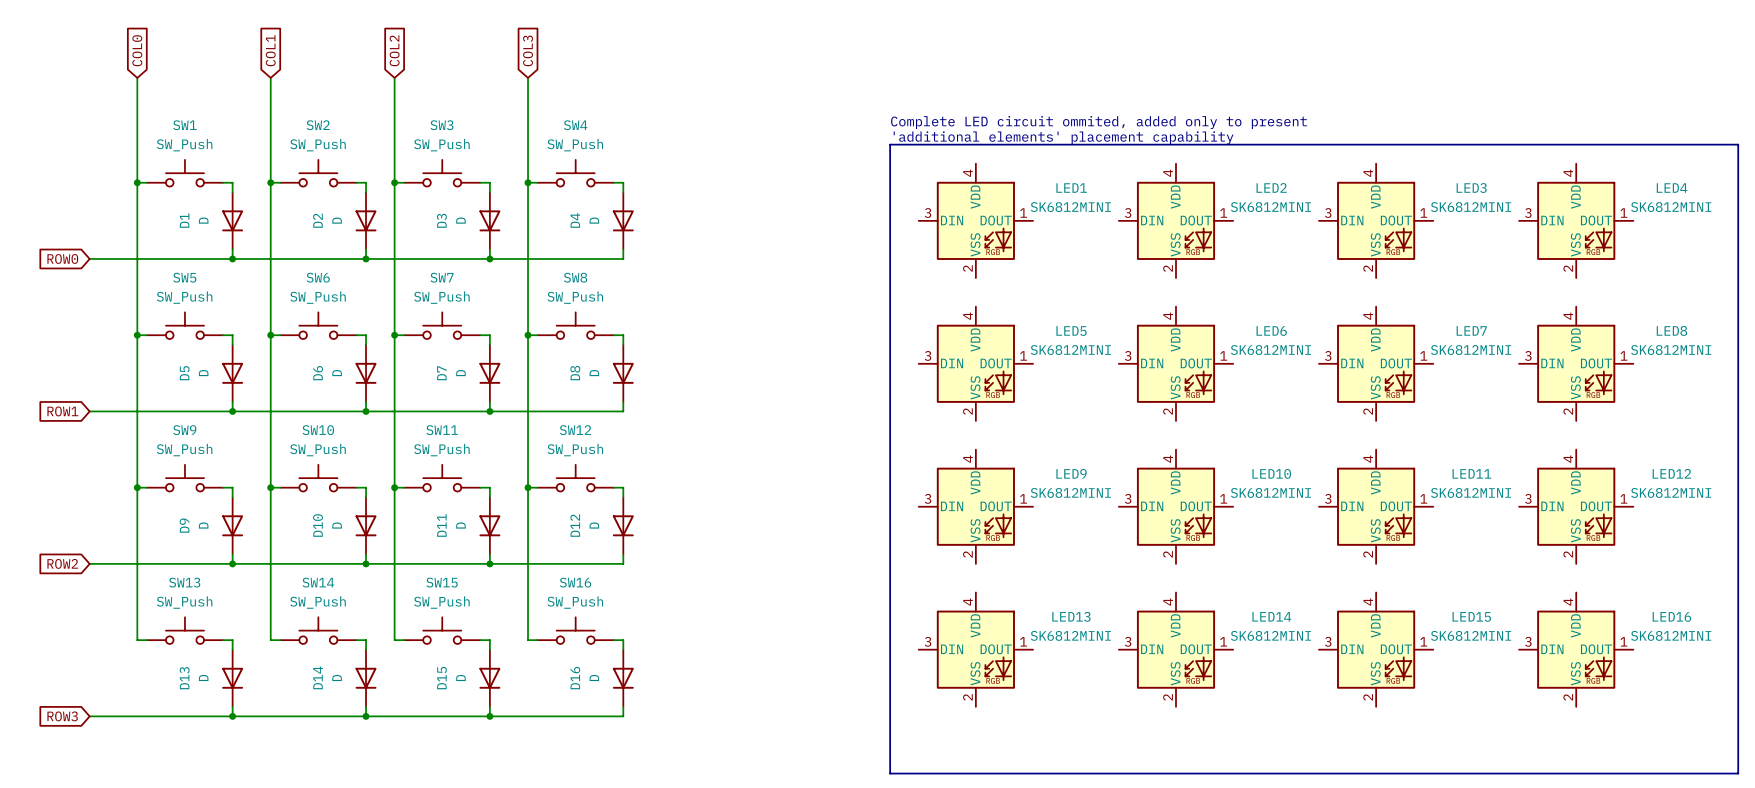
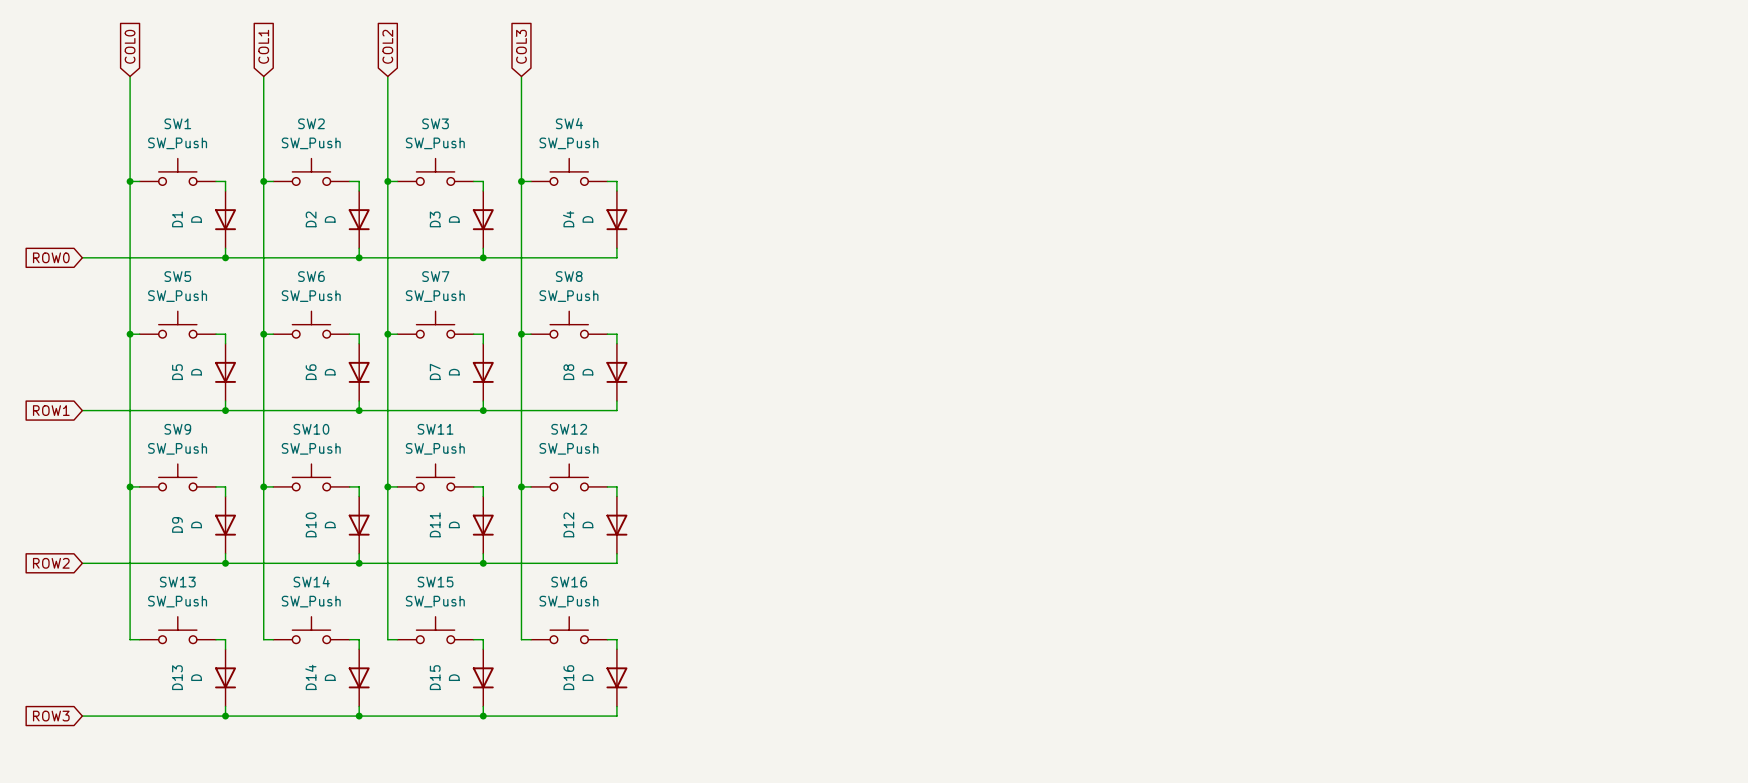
text: Complete LED circuit ommited, added only to present (1098, 122) -> none
text: 'additional elements' placement capability (1063, 137) -> none
line: (890, 144) (1738, 144) (1738, 773) (890, 773) (890, 144) -> none
LED1: SK6812MINI (975, 220) -> none
LED2: SK6812MINI (1176, 220) -> none
LED3: SK6812MINI (1376, 220) -> none
LED4: SK6812MINI (1576, 220) -> none
LED5: SK6812MINI (975, 363) -> none
LED6: SK6812MINI (1176, 363) -> none
LED7: SK6812MINI (1376, 363) -> none
LED8: SK6812MINI (1576, 363) -> none
LED9: SK6812MINI (975, 506) -> none
LED10: SK6812MINI (1176, 506) -> none
LED11: SK6812MINI (1376, 506) -> none
LED12: SK6812MINI (1576, 506) -> none
LED13: SK6812MINI (975, 649) -> none
LED14: SK6812MINI (1176, 649) -> none
LED15: SK6812MINI (1376, 649) -> none
LED16: SK6812MINI (1576, 649) -> none

